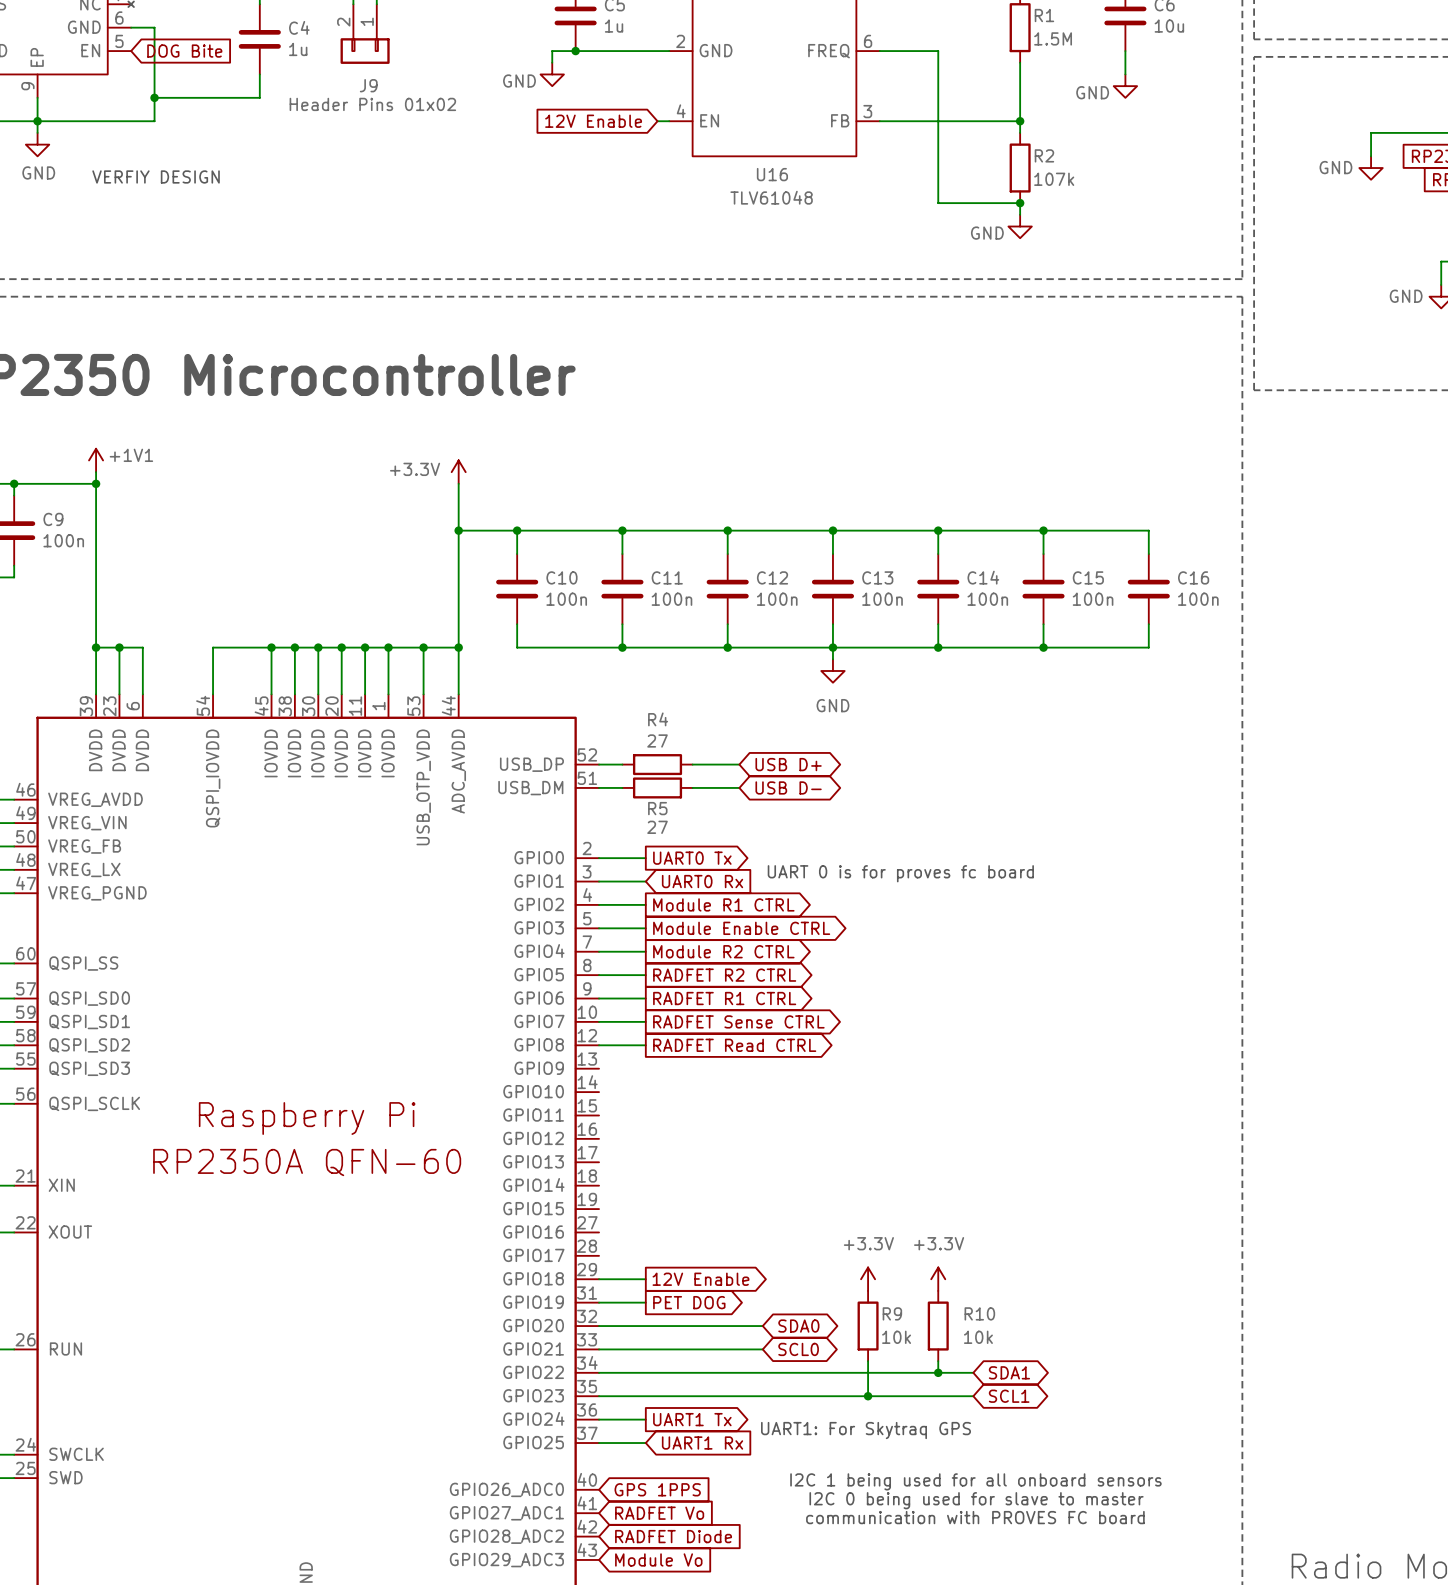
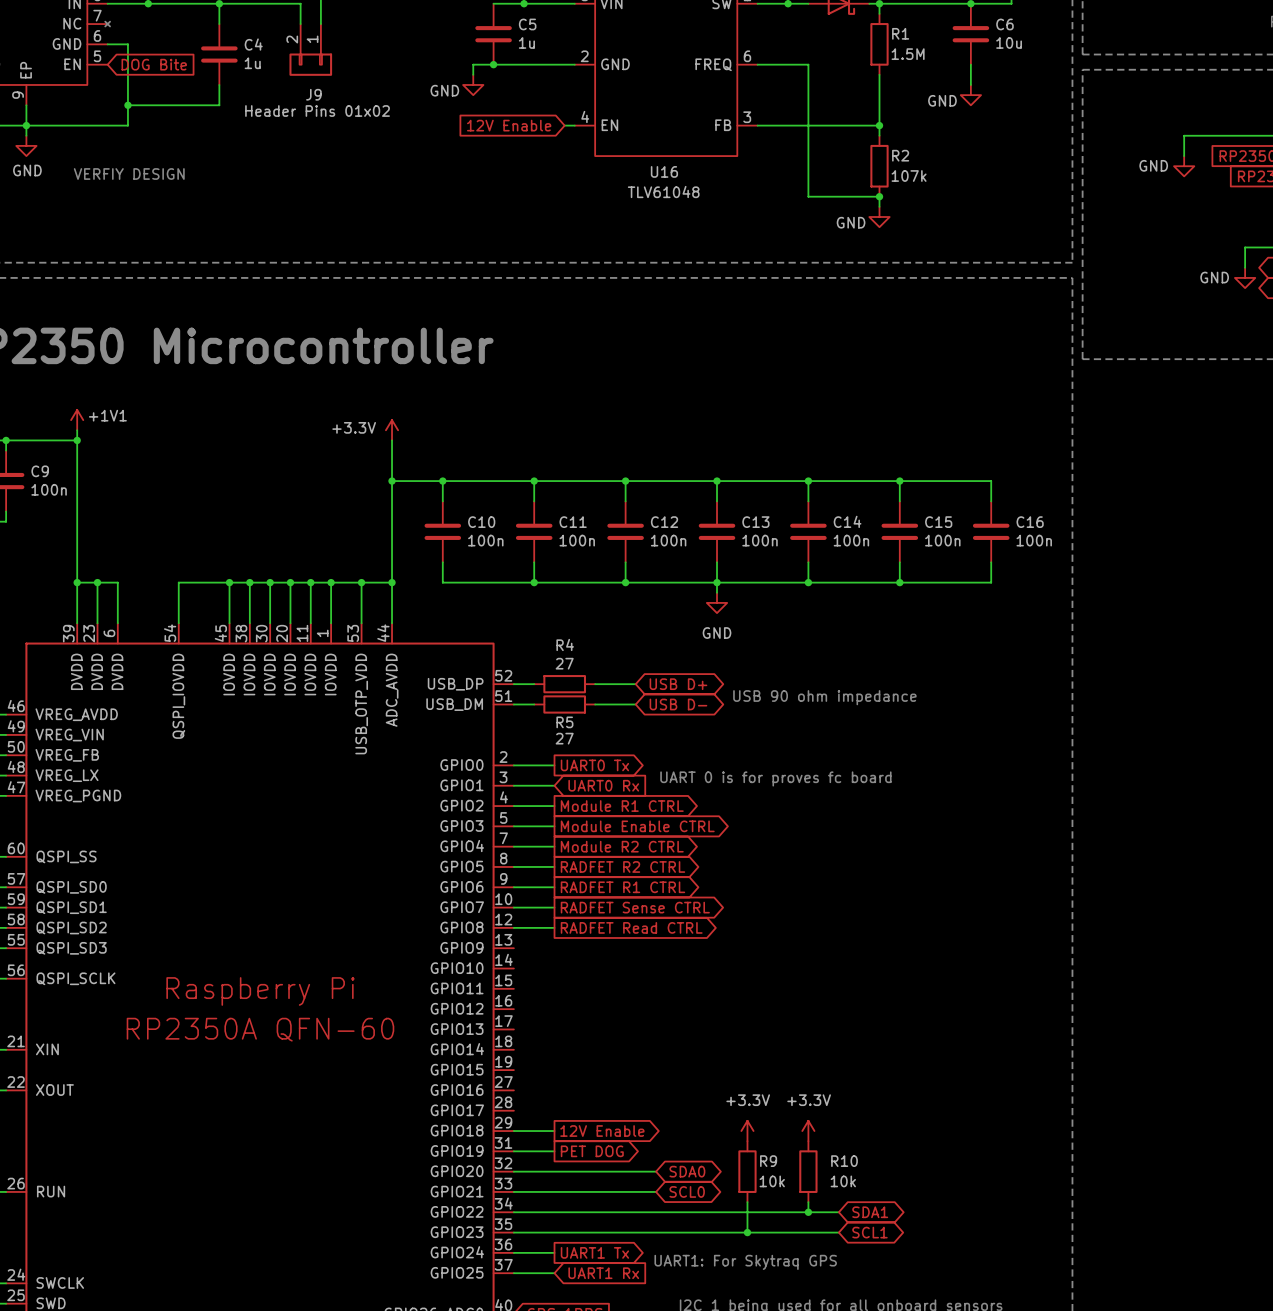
text: none -> USB 90 ohm impedance (824, 697)

